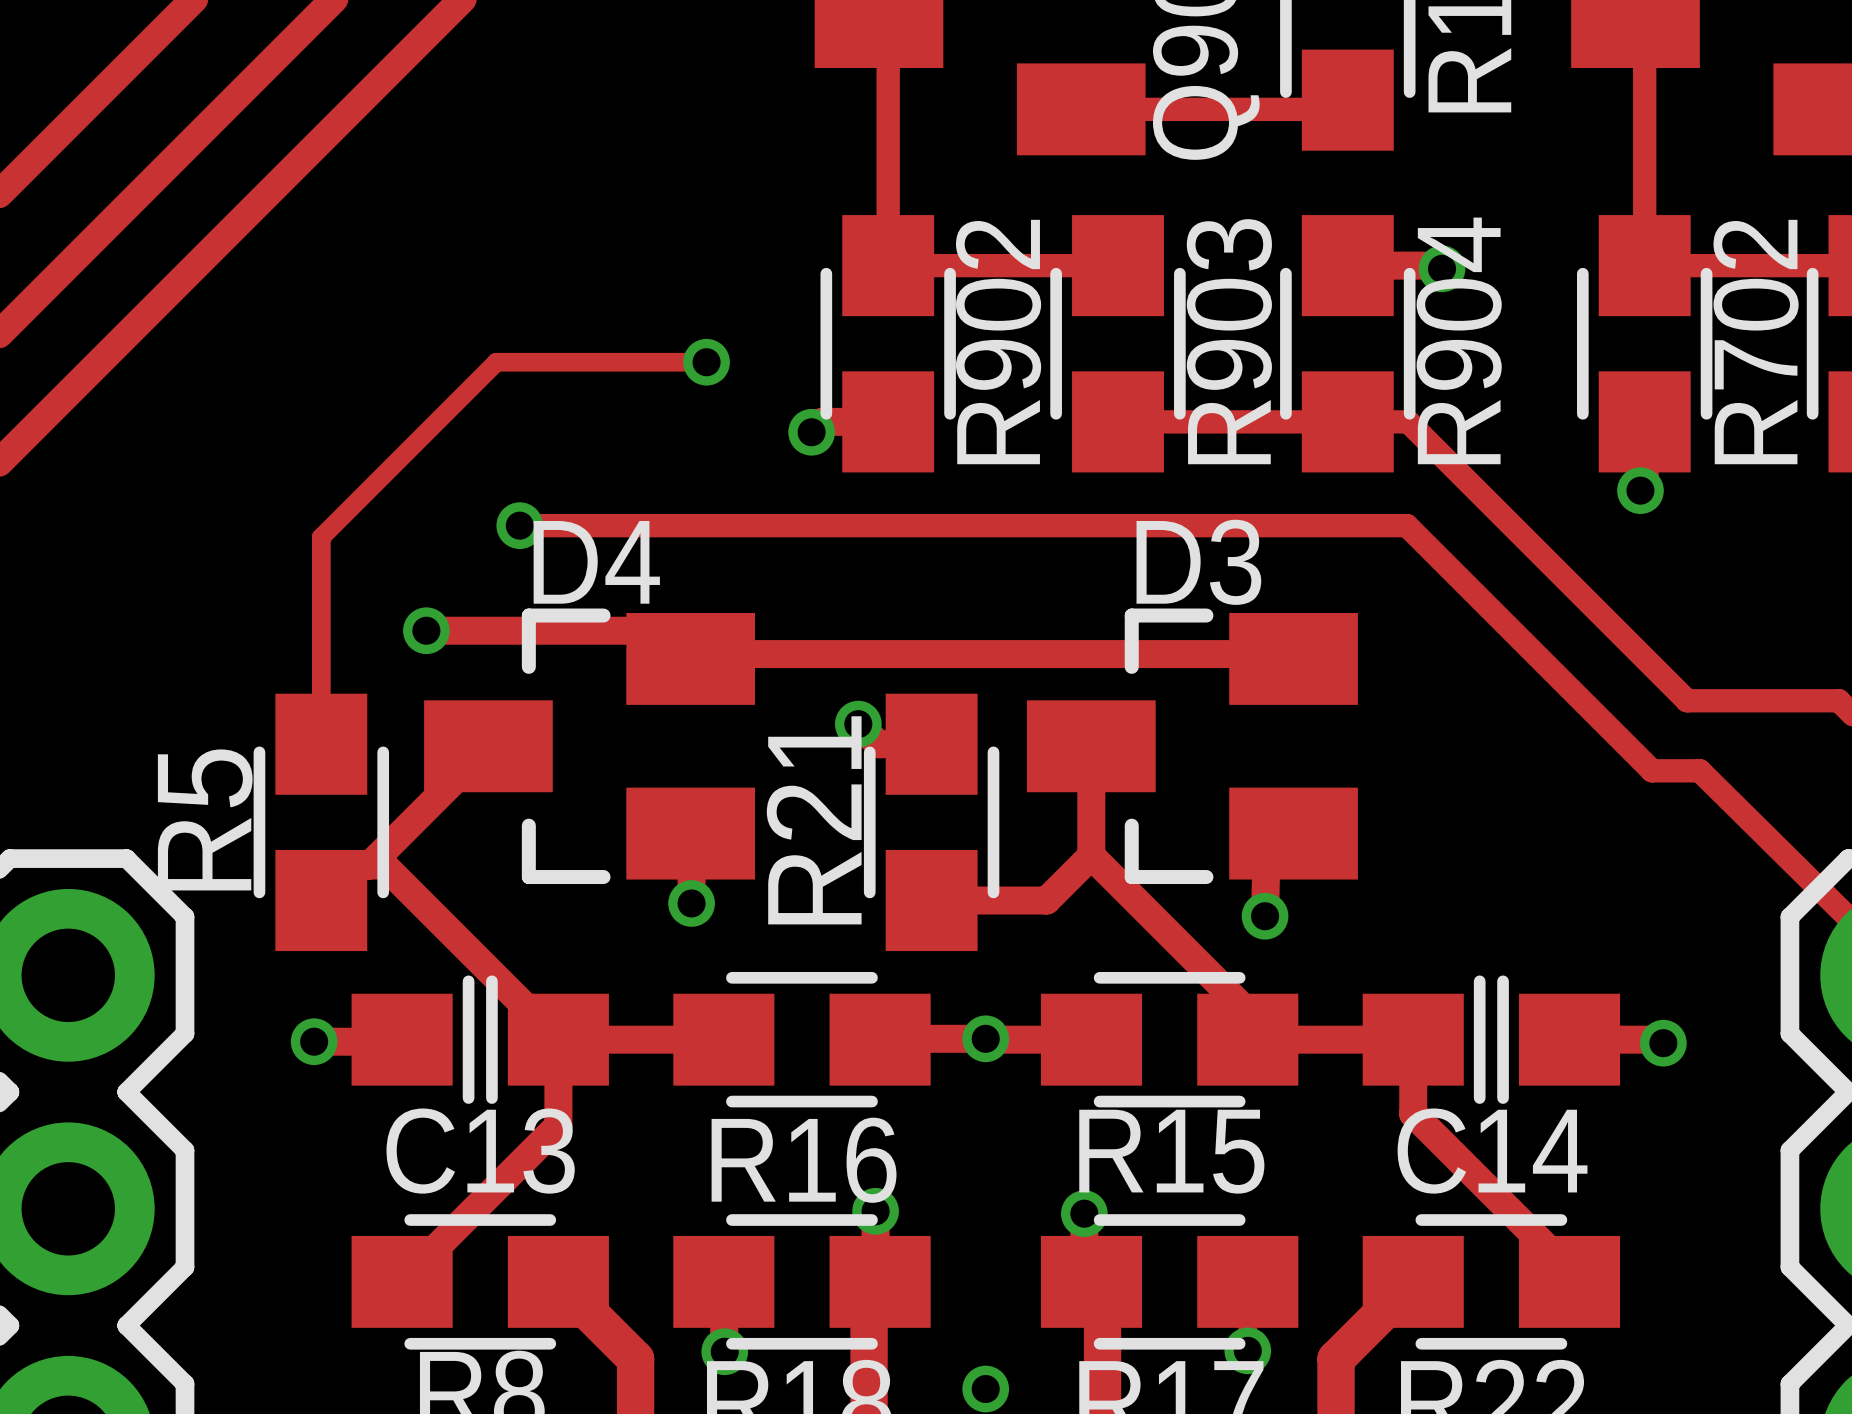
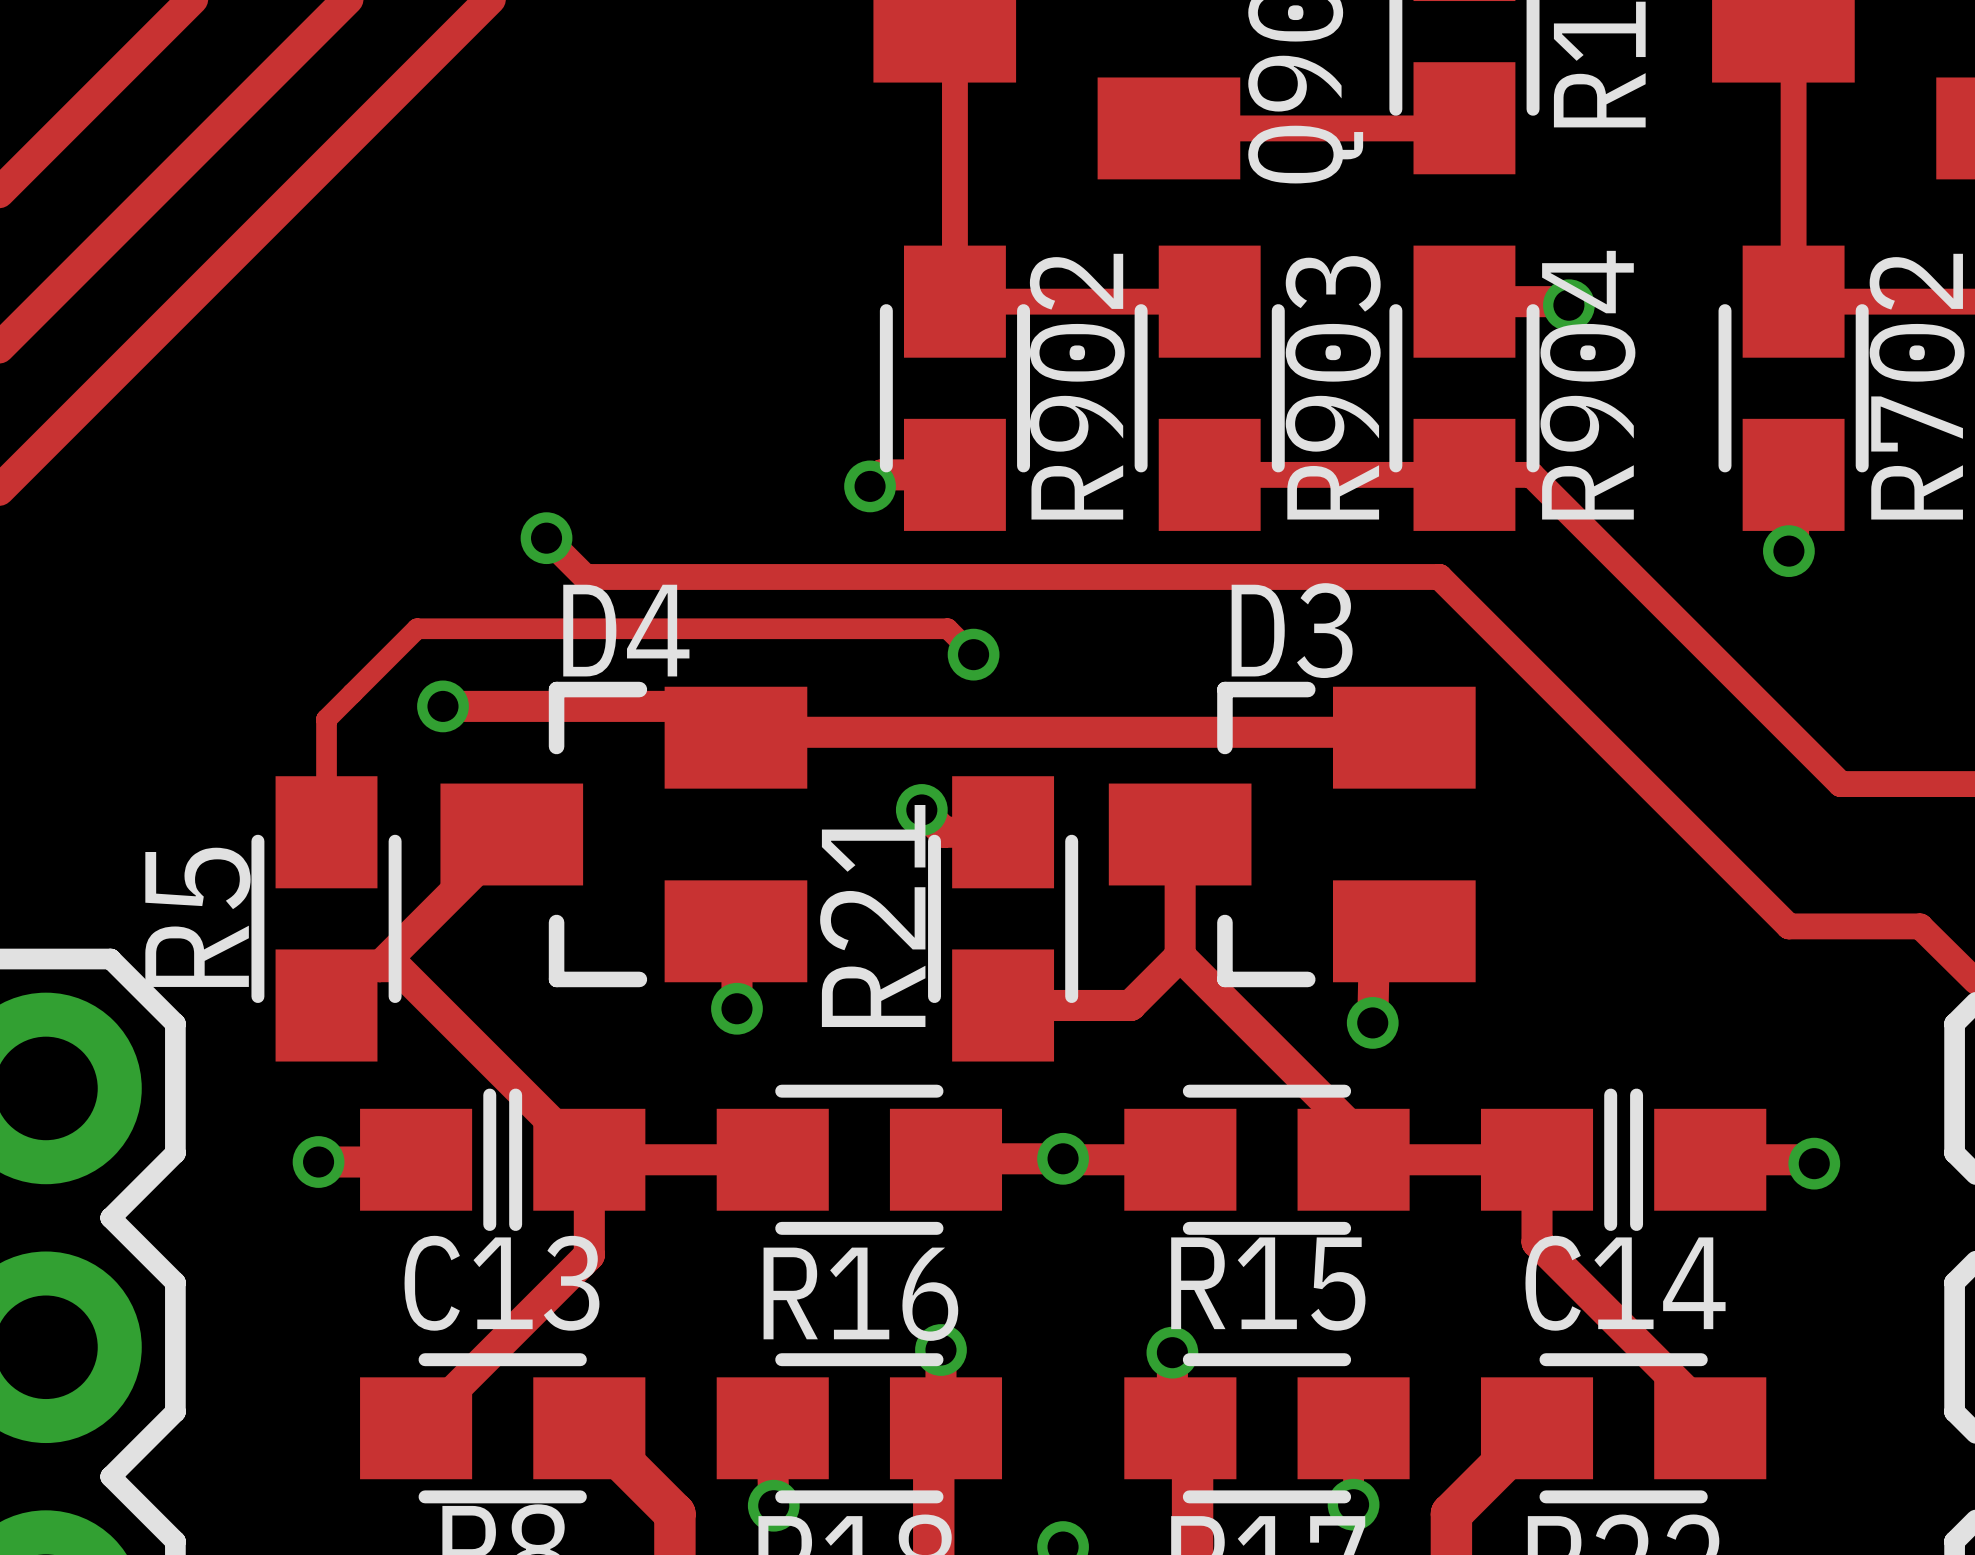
top track: (706, 362) (496, 362) (321, 537) (321, 642) -> (973, 654) (947, 628) (417, 628) (326, 719)
via: (706, 362) -> none
top track: (519, 525) (1406, 525) (1652, 770) (1699, 770) (1758, 829) -> (546, 538) (585, 576) (1439, 576) (1788, 926) (1920, 926)
via position: (519, 525) -> (546, 538)
via: none -> (973, 654)

